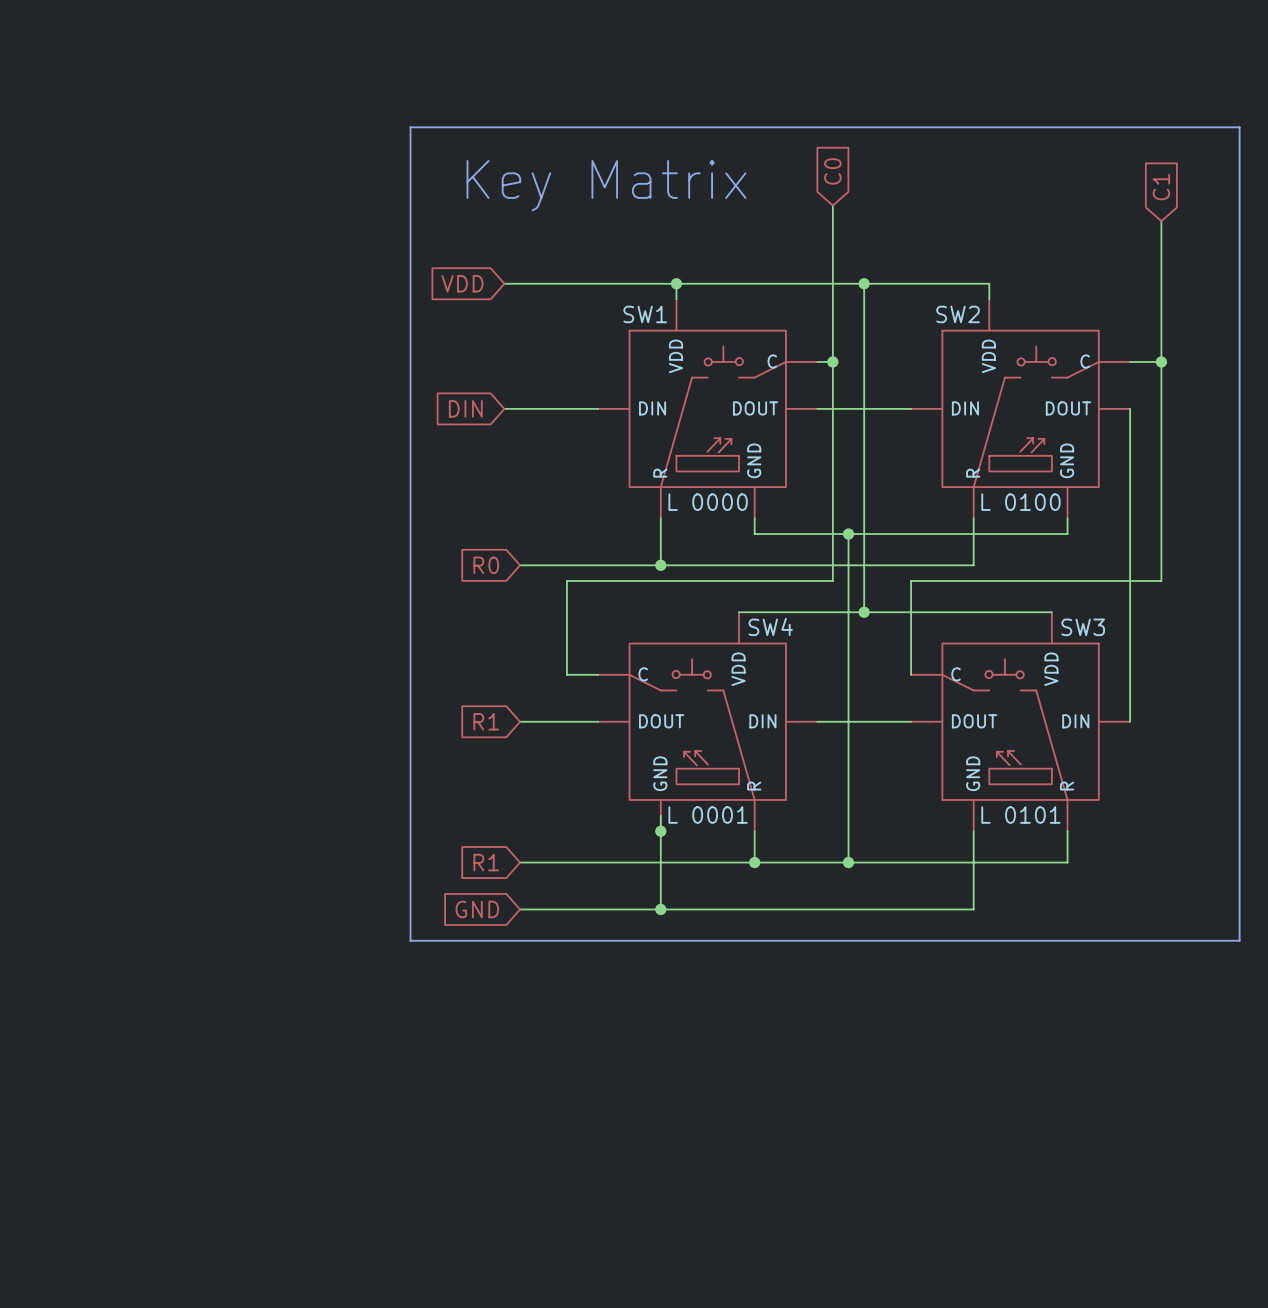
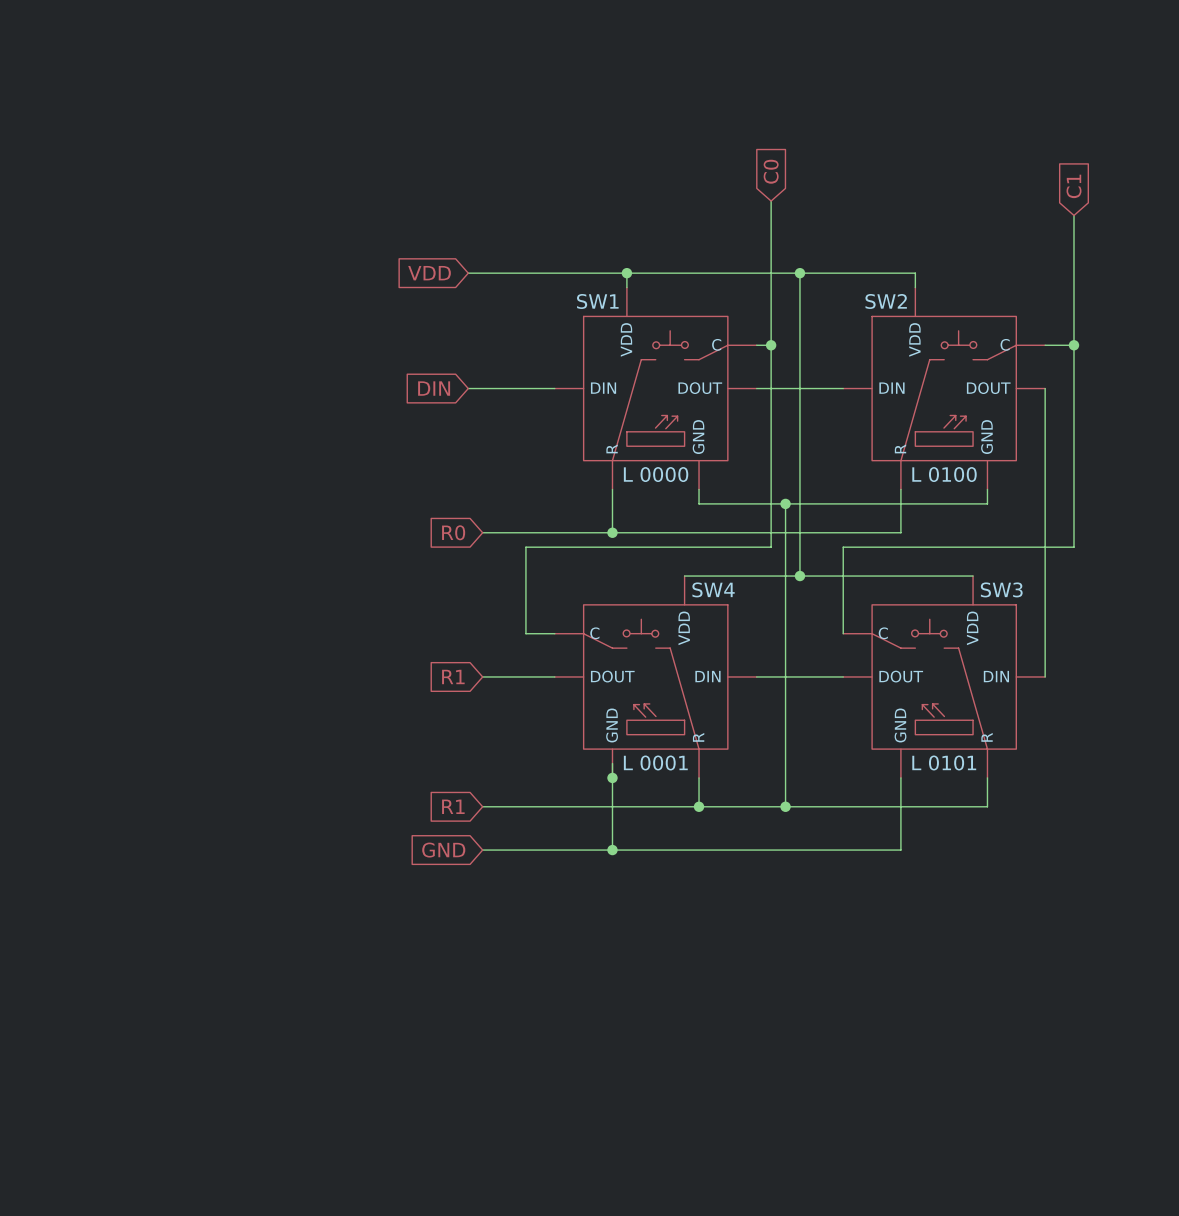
line: (410, 127) (1239, 127) (1239, 940) (410, 940) (410, 127) -> none
text: Key Matrix (606, 185) -> none

